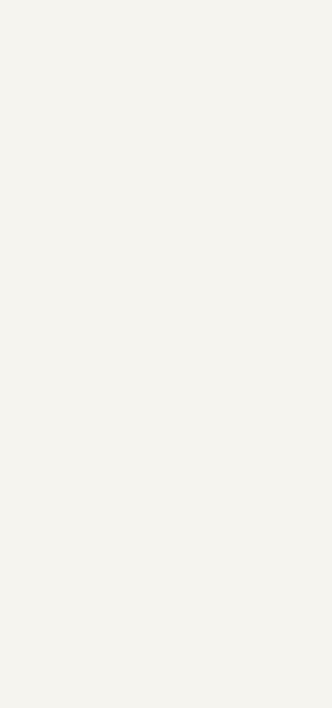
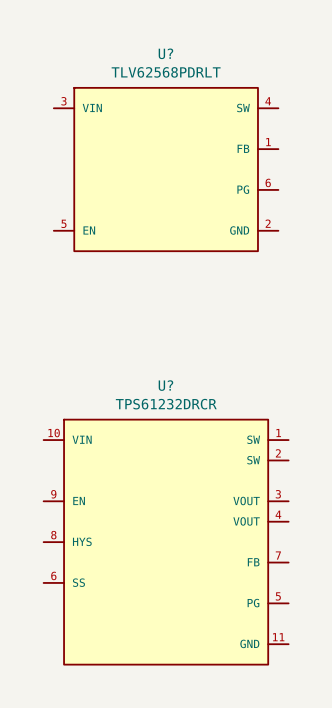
U?: none -> TLV62568PDRLT (166, 169)
U?: none -> TPS61232DRCR (166, 542)

